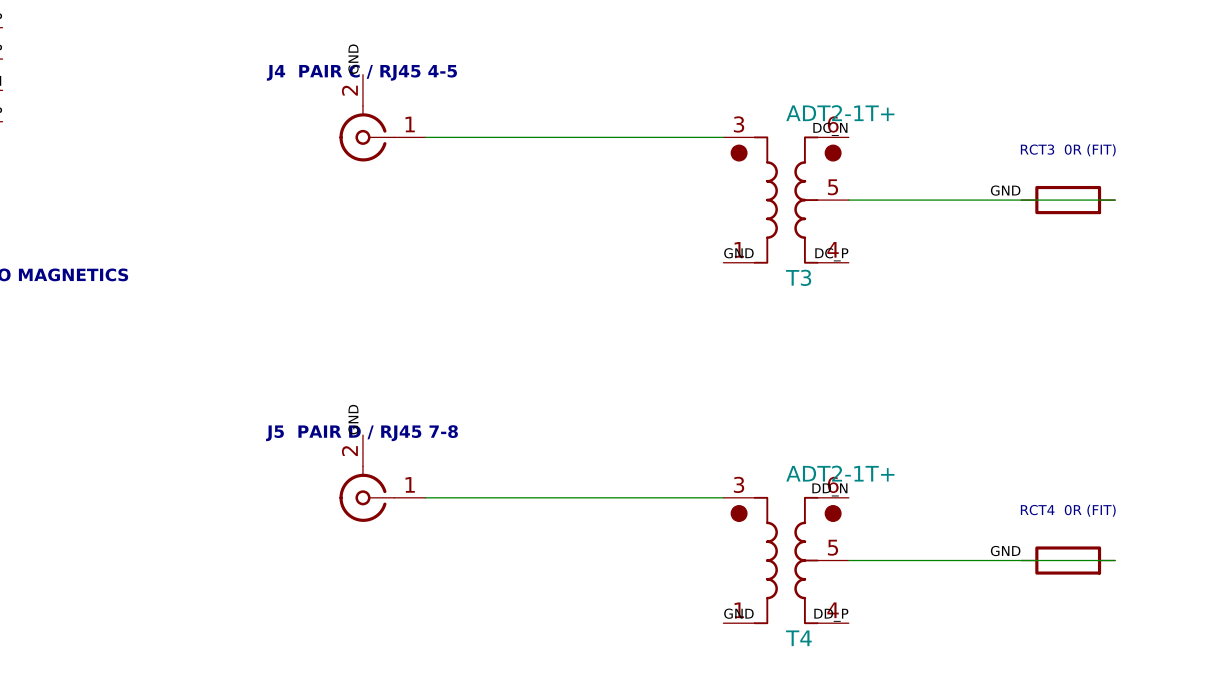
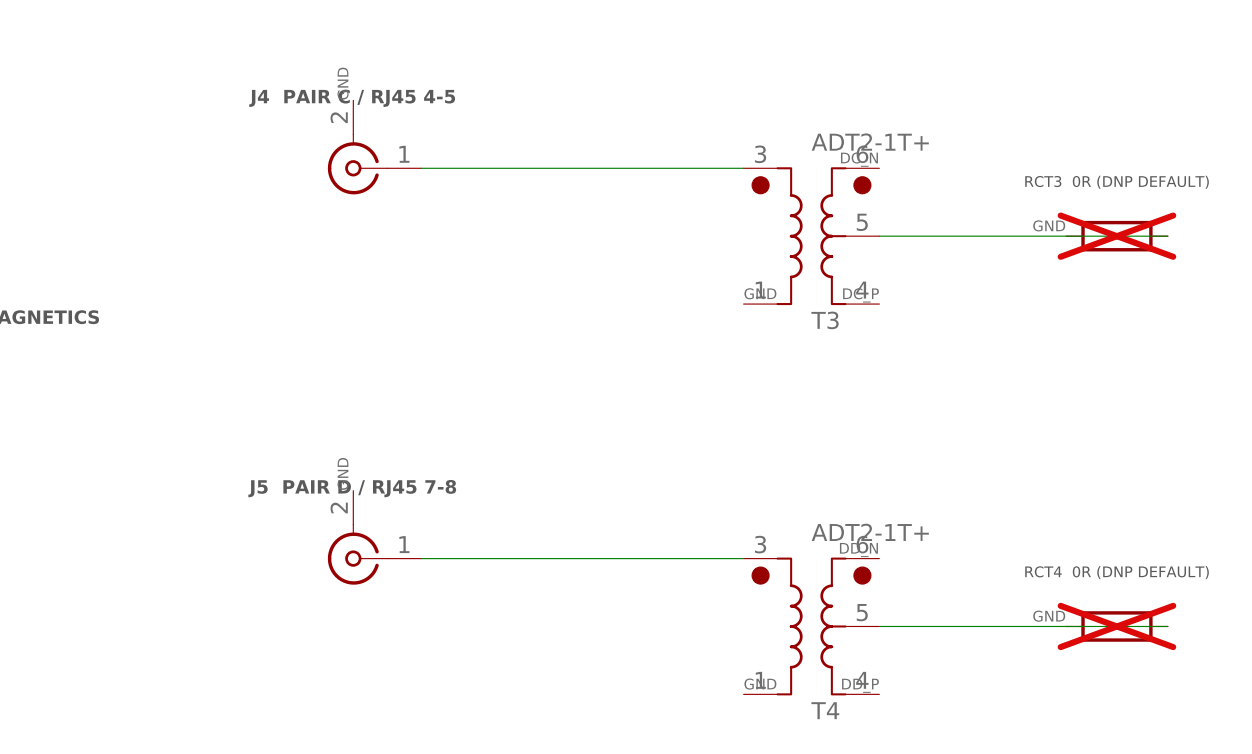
text: RCT3 0R (FIT) (1068, 150) -> RCT3 0R (DNP DEFAULT) (1117, 182)
part do-not-place cross: none -> (1116, 236)
text: RCT4 0R (FIT) (1068, 510) -> RCT4 0R (DNP DEFAULT) (1117, 572)
part do-not-place cross: none -> (1116, 626)

